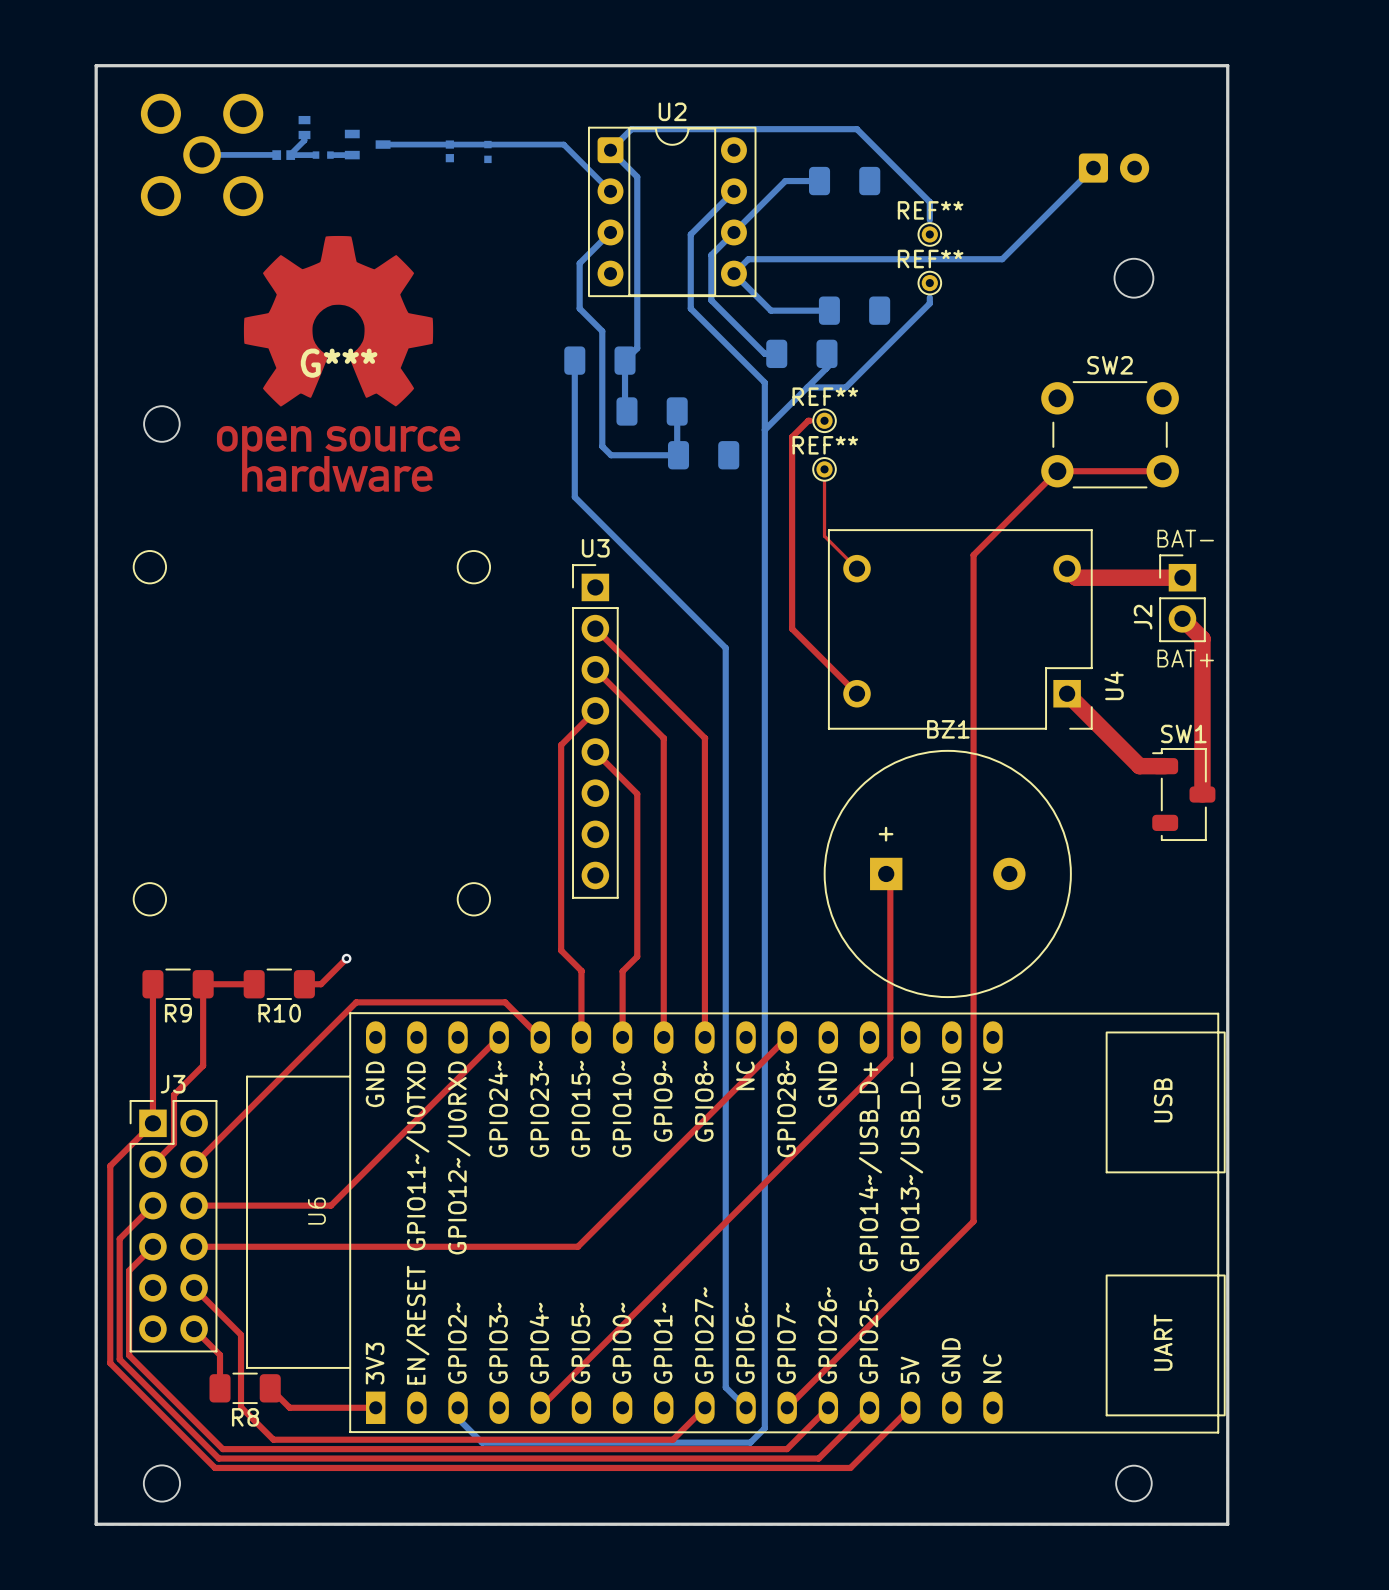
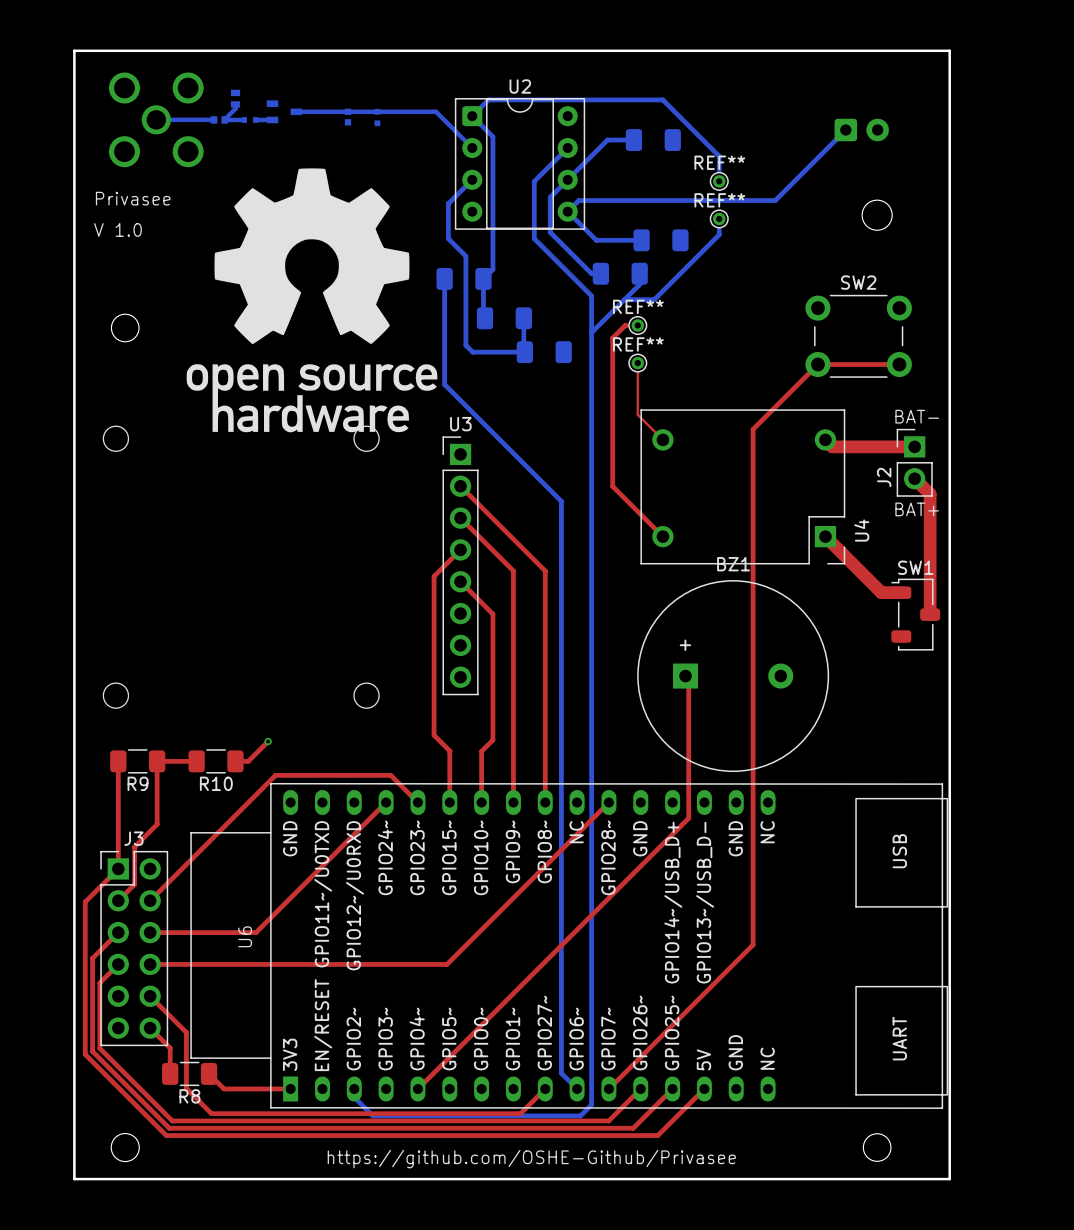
drawing: none -> [186, 168, 438, 433]
text: none -> Privasee (133, 198)
text: none -> V 1.0 (117, 229)
G***: (338, 364) -> none
text: none -> https://github.com/OSHE-Github/Privasee (531, 1159)

